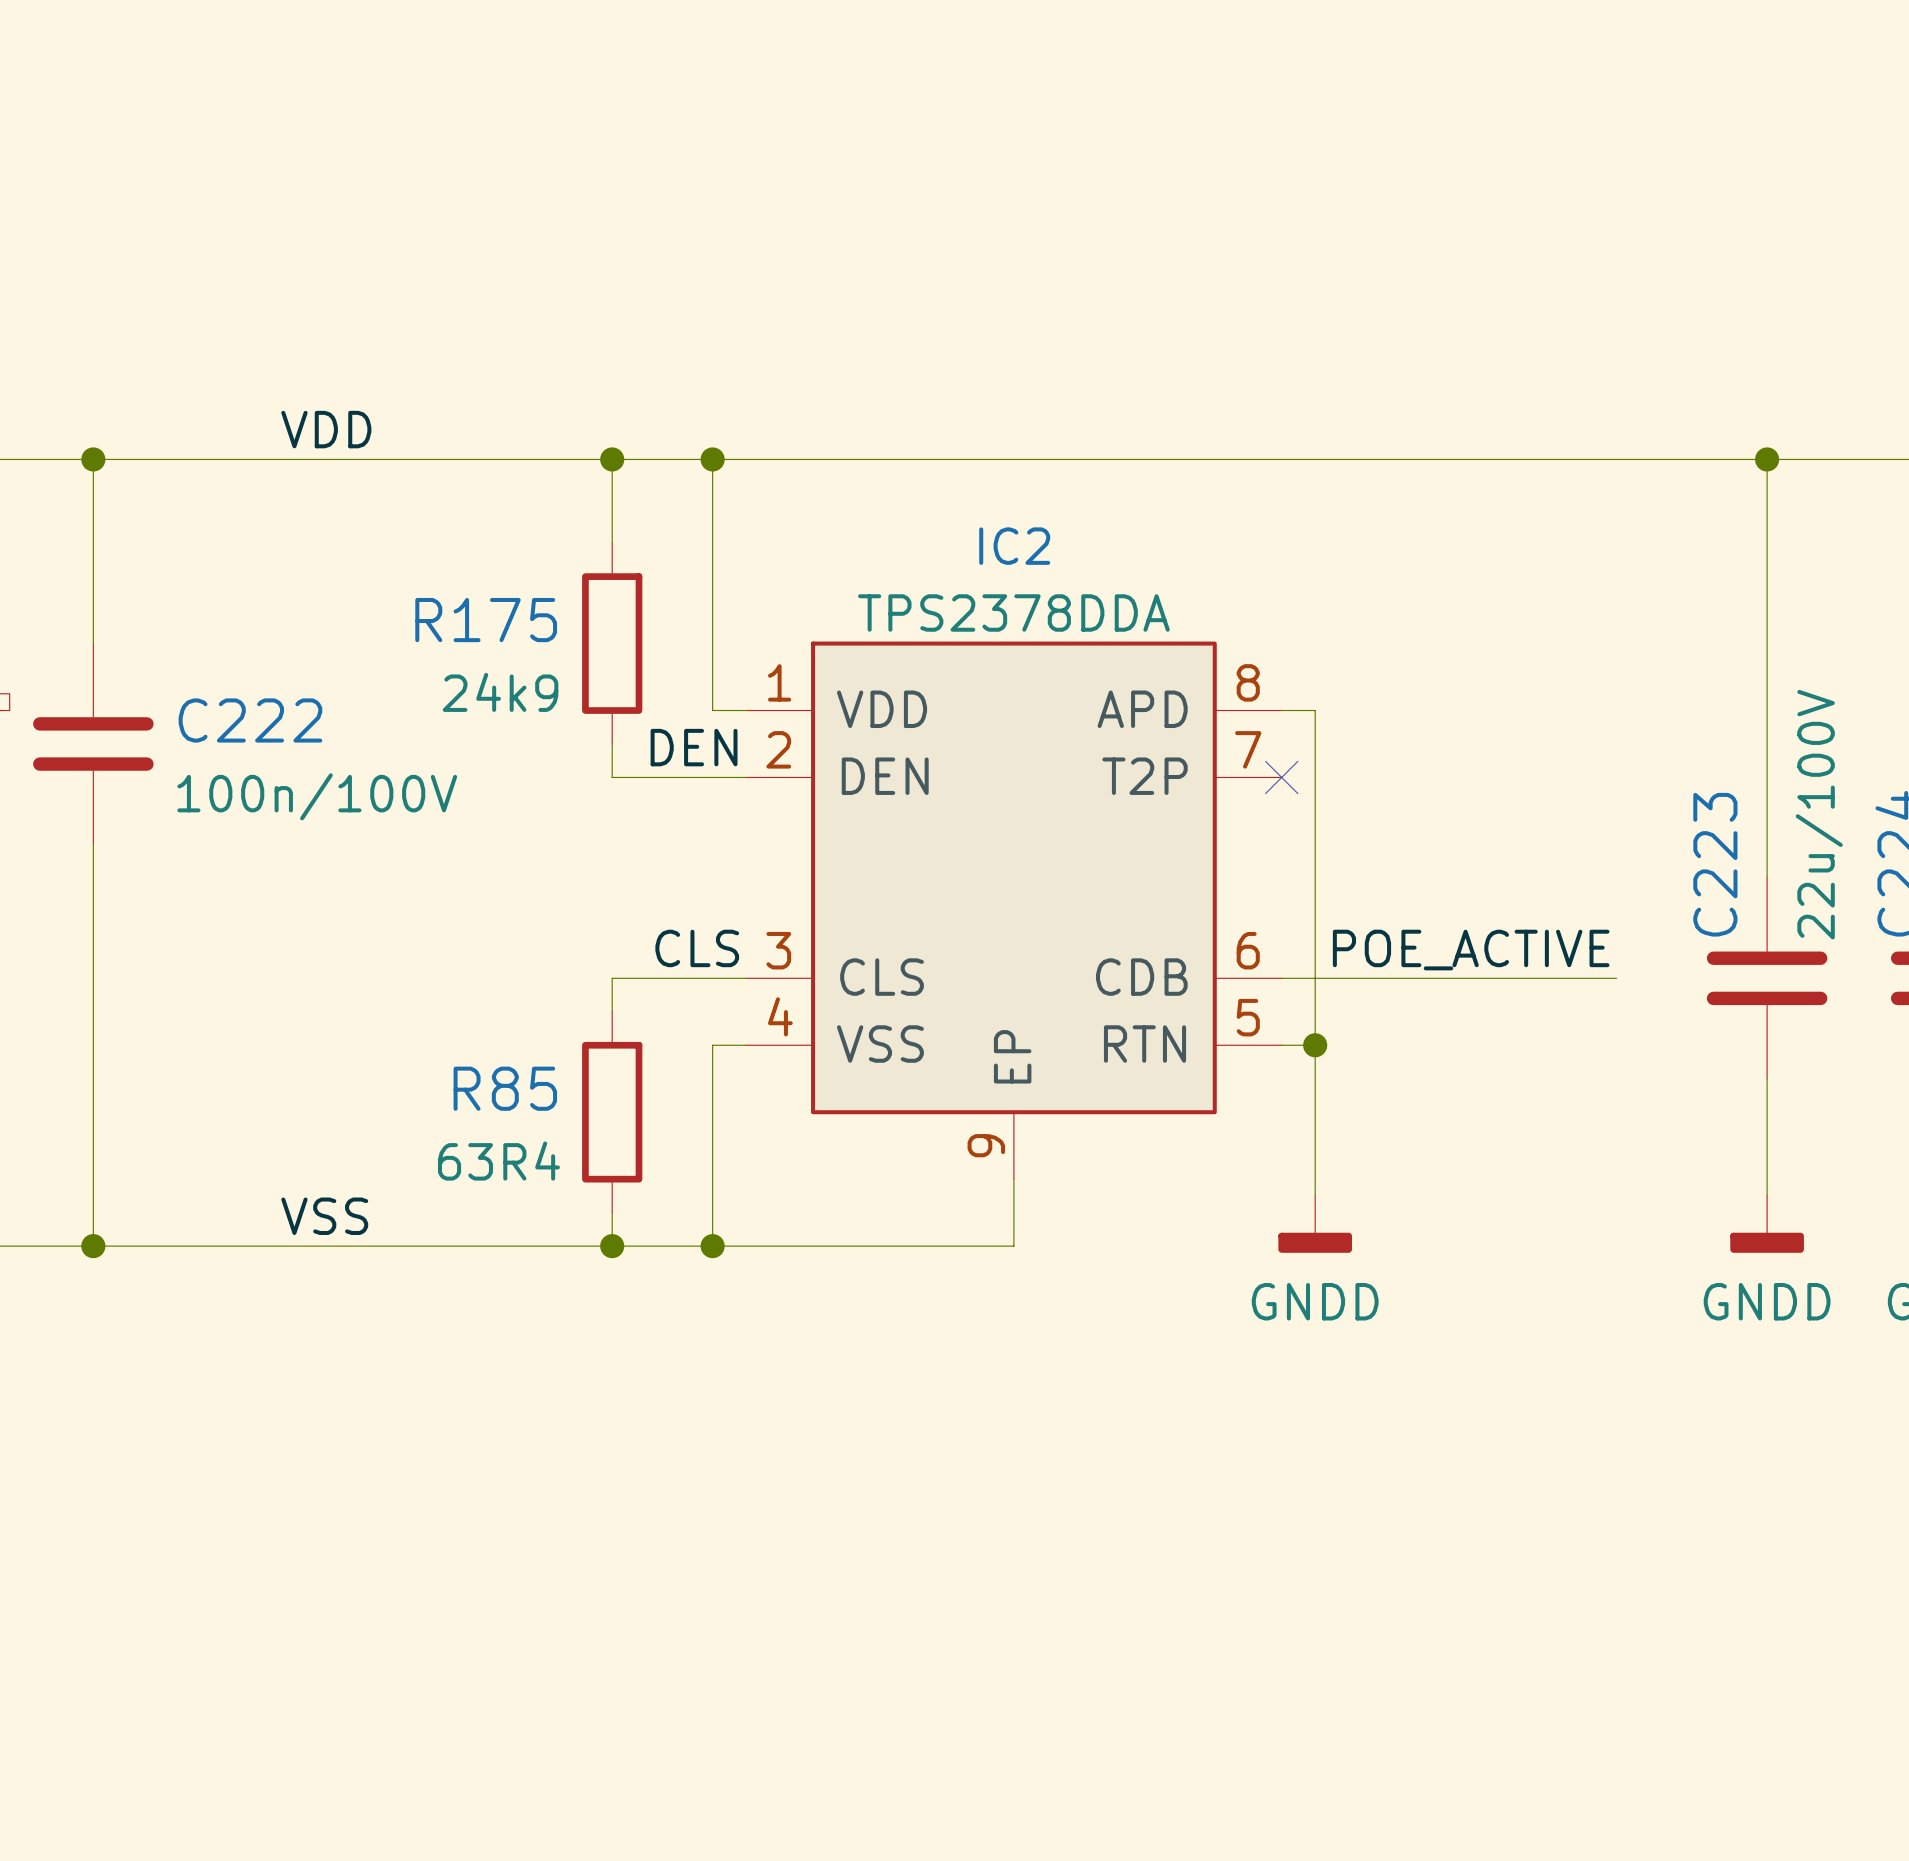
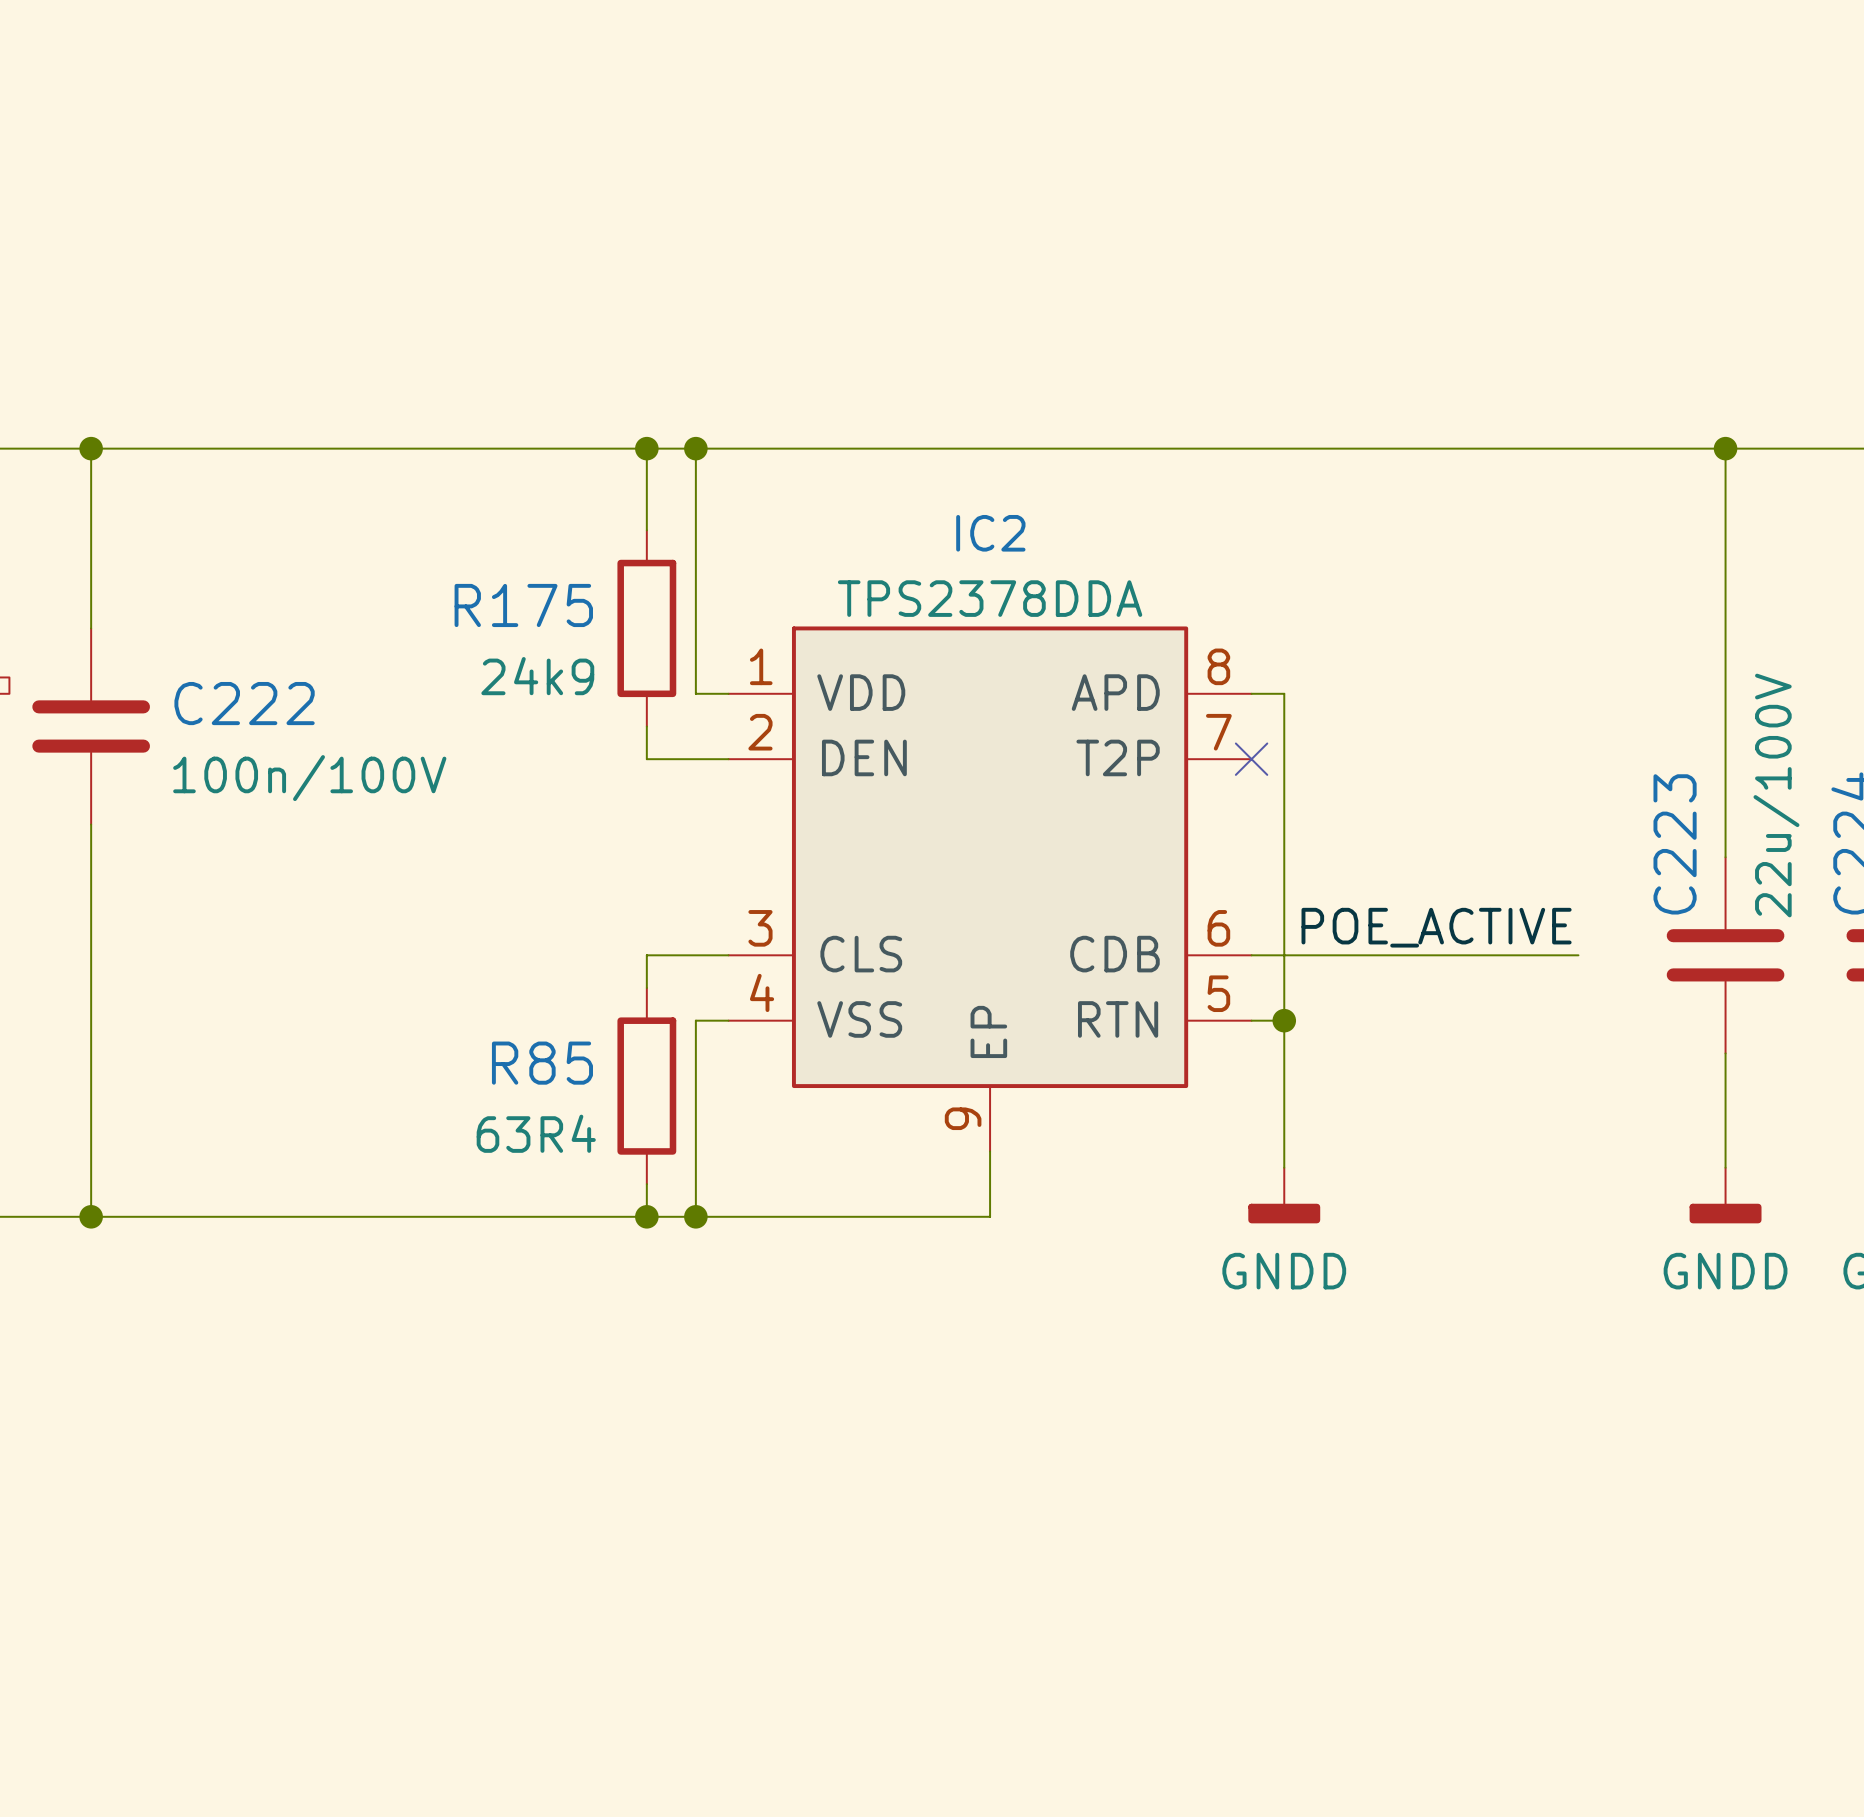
label: VDD (326, 429) -> none
wire: (612, 459) (612, 543) -> (646, 448) (646, 530)
junction position: (612, 459) -> (646, 448)
R175 position: (612, 643) -> (646, 628)
wire: (612, 743) (612, 777) (662, 777) -> (646, 726) (646, 759)
label: DEN (694, 747) -> none
label: CLS (697, 948) -> none
wire: (662, 978) (612, 978) (612, 1011) -> (646, 955) (646, 987)
R85 position: (612, 1112) -> (646, 1086)
wire: (612, 1212) (612, 1246) -> (646, 1184) (646, 1216)
label: VSS (324, 1216) -> none
junction position: (612, 1246) -> (646, 1216)

